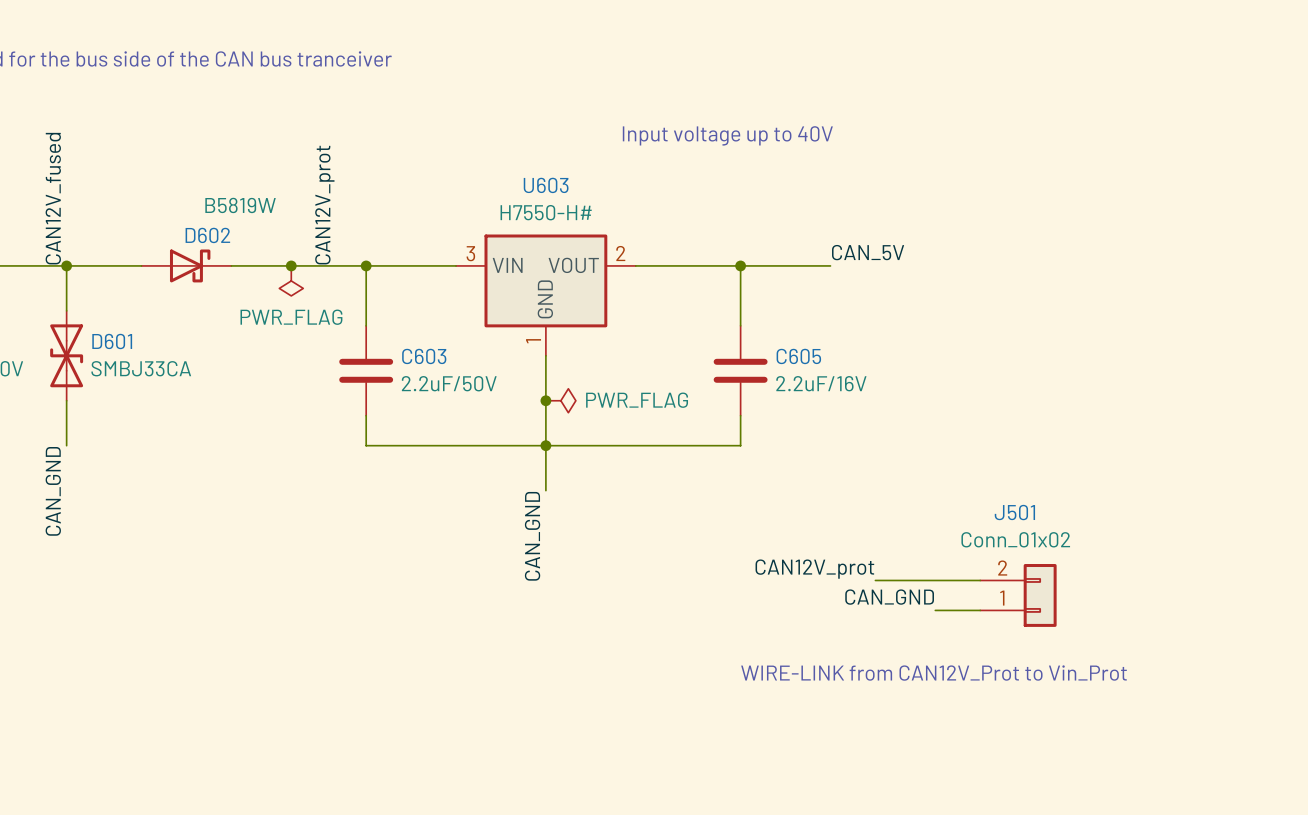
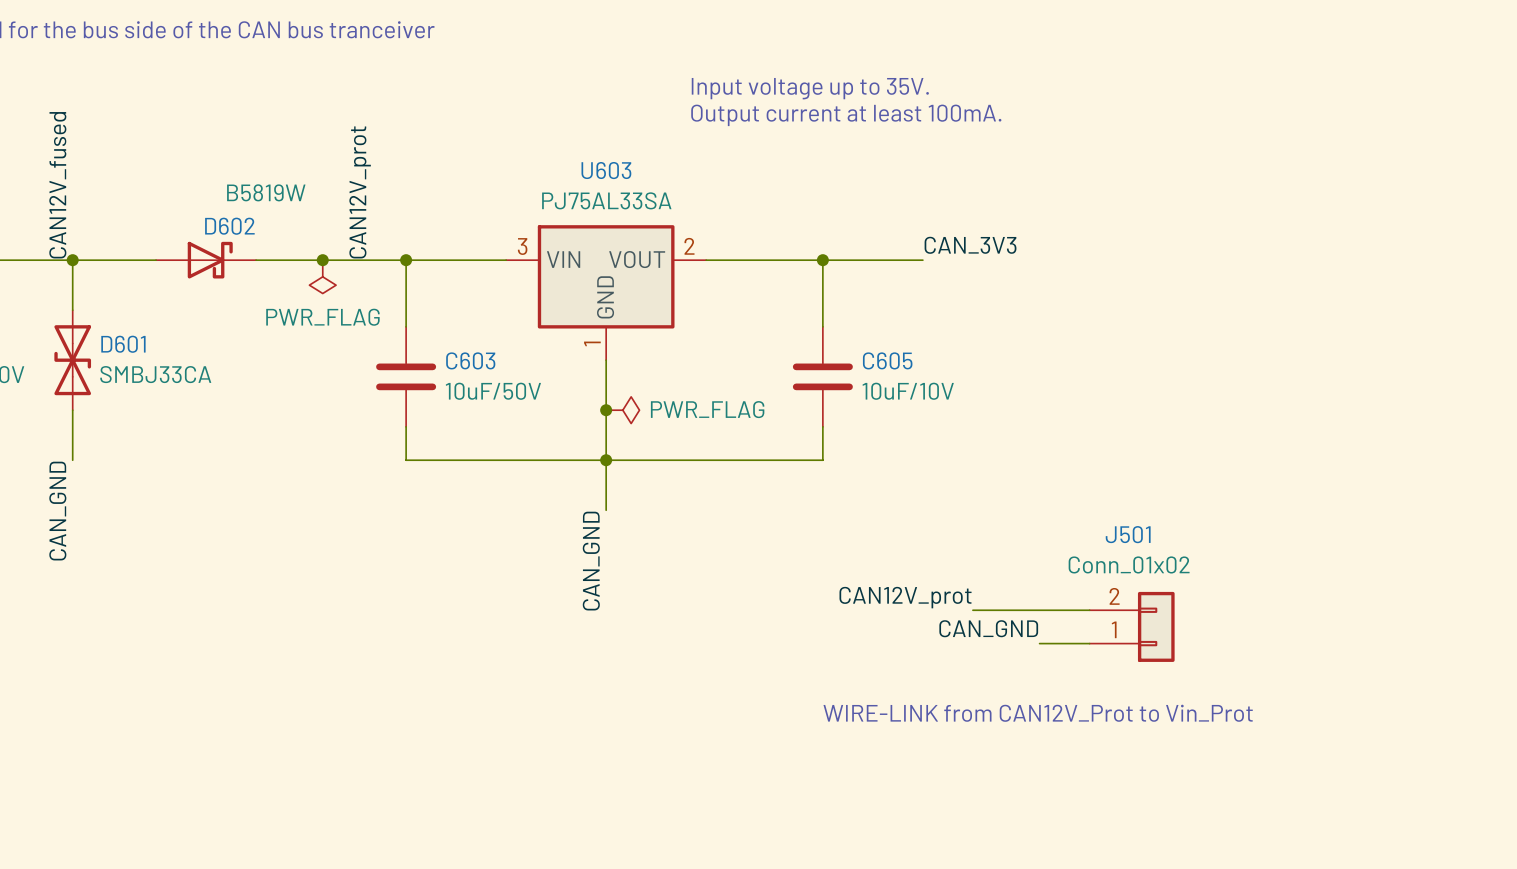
text: none -> Input voltage up to 35V. (810, 88)
text: Input voltage up to 40V (727, 135) -> Output current at least 100mA. (846, 115)
U603 value: H7550-H# (546, 212) -> PJ75AL33SA (606, 200)
label: CAN_5V (868, 252) -> CAN_3V3 (970, 245)
C603 value: 2.2uF/50V (449, 383) -> 10uF/50V (493, 391)
C605 value: 2.2uF/16V (821, 383) -> 10uF/10V (908, 391)

